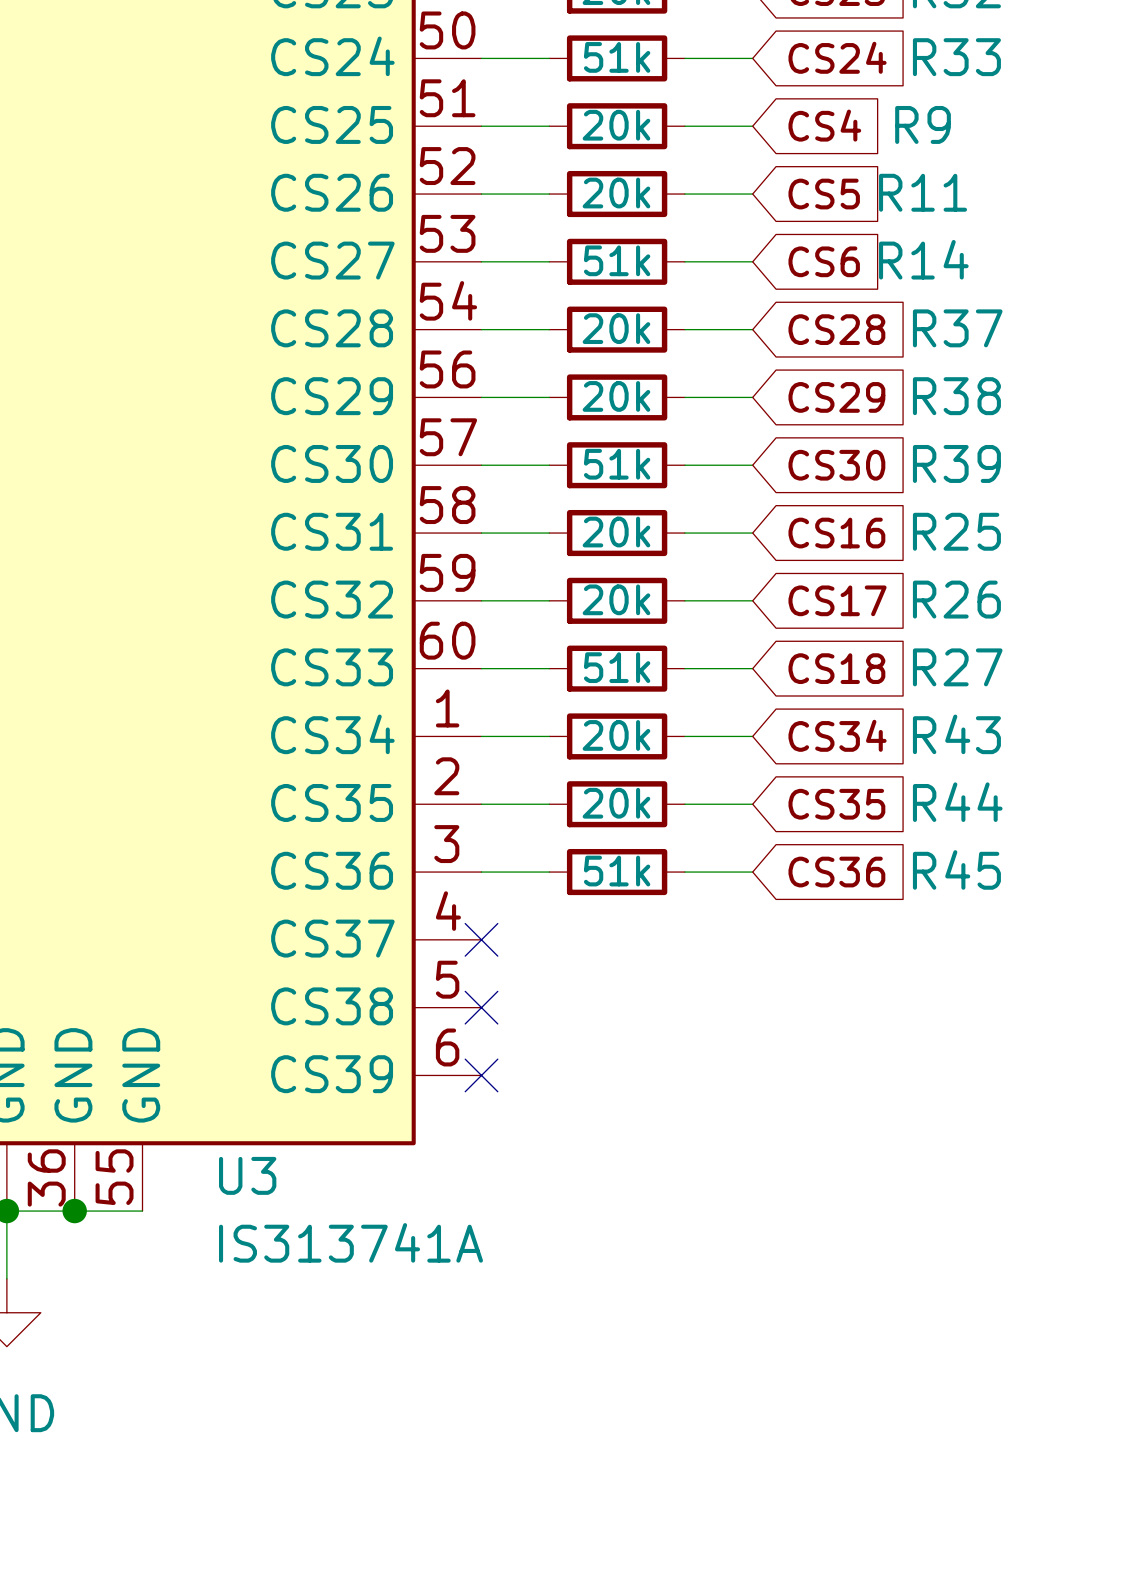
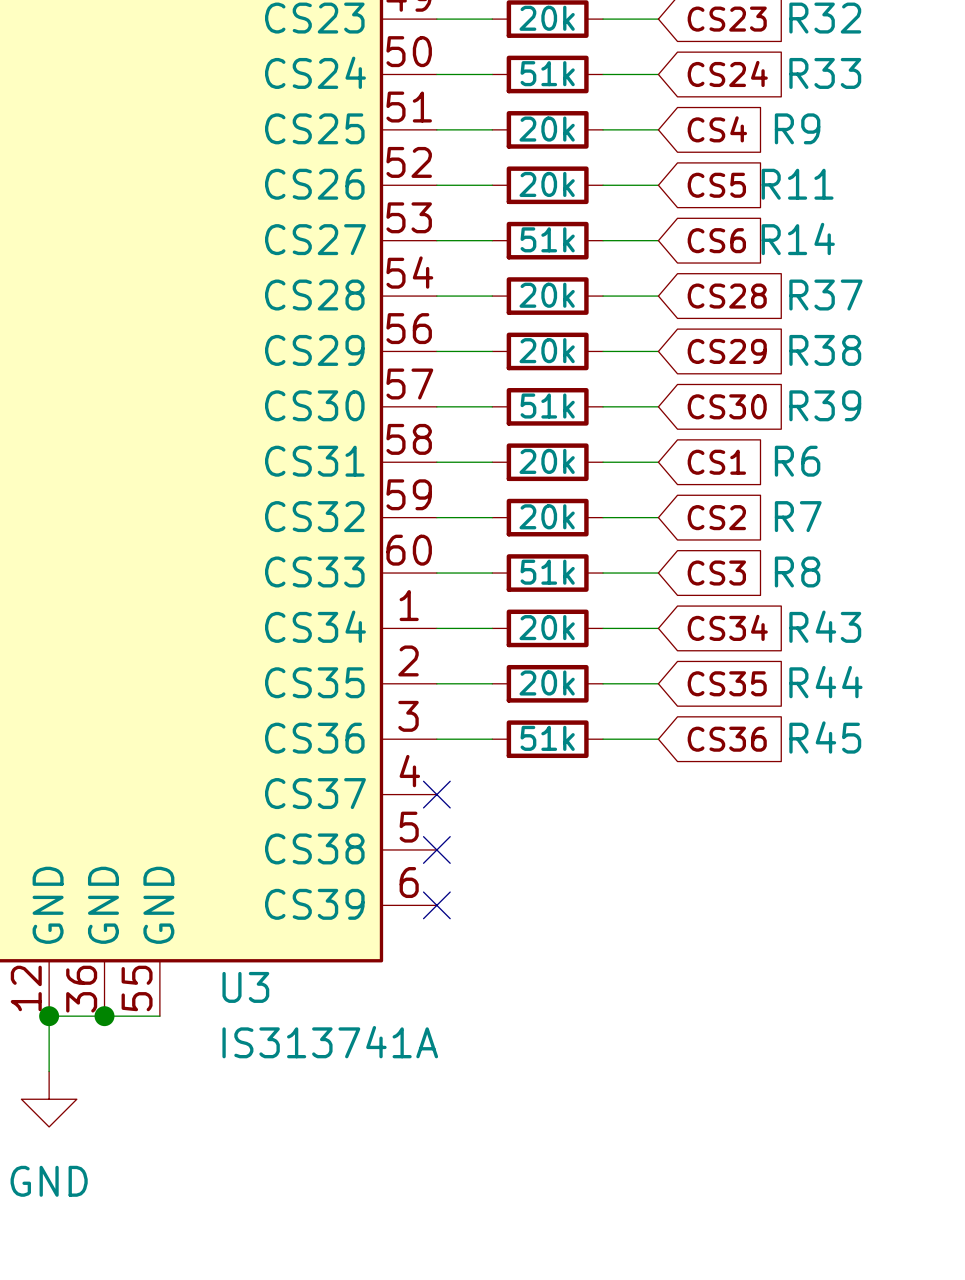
R25 name: R25 (956, 531) -> R6 (797, 461)
global label: CS16 (836, 533) -> CS1 (716, 462)
R26 name: R26 (956, 599) -> R7 (798, 516)
global label: CS17 (837, 600) -> CS2 (716, 517)
R27 name: R27 (957, 667) -> R8 (797, 571)
global label: CS18 (836, 668) -> CS3 (716, 573)

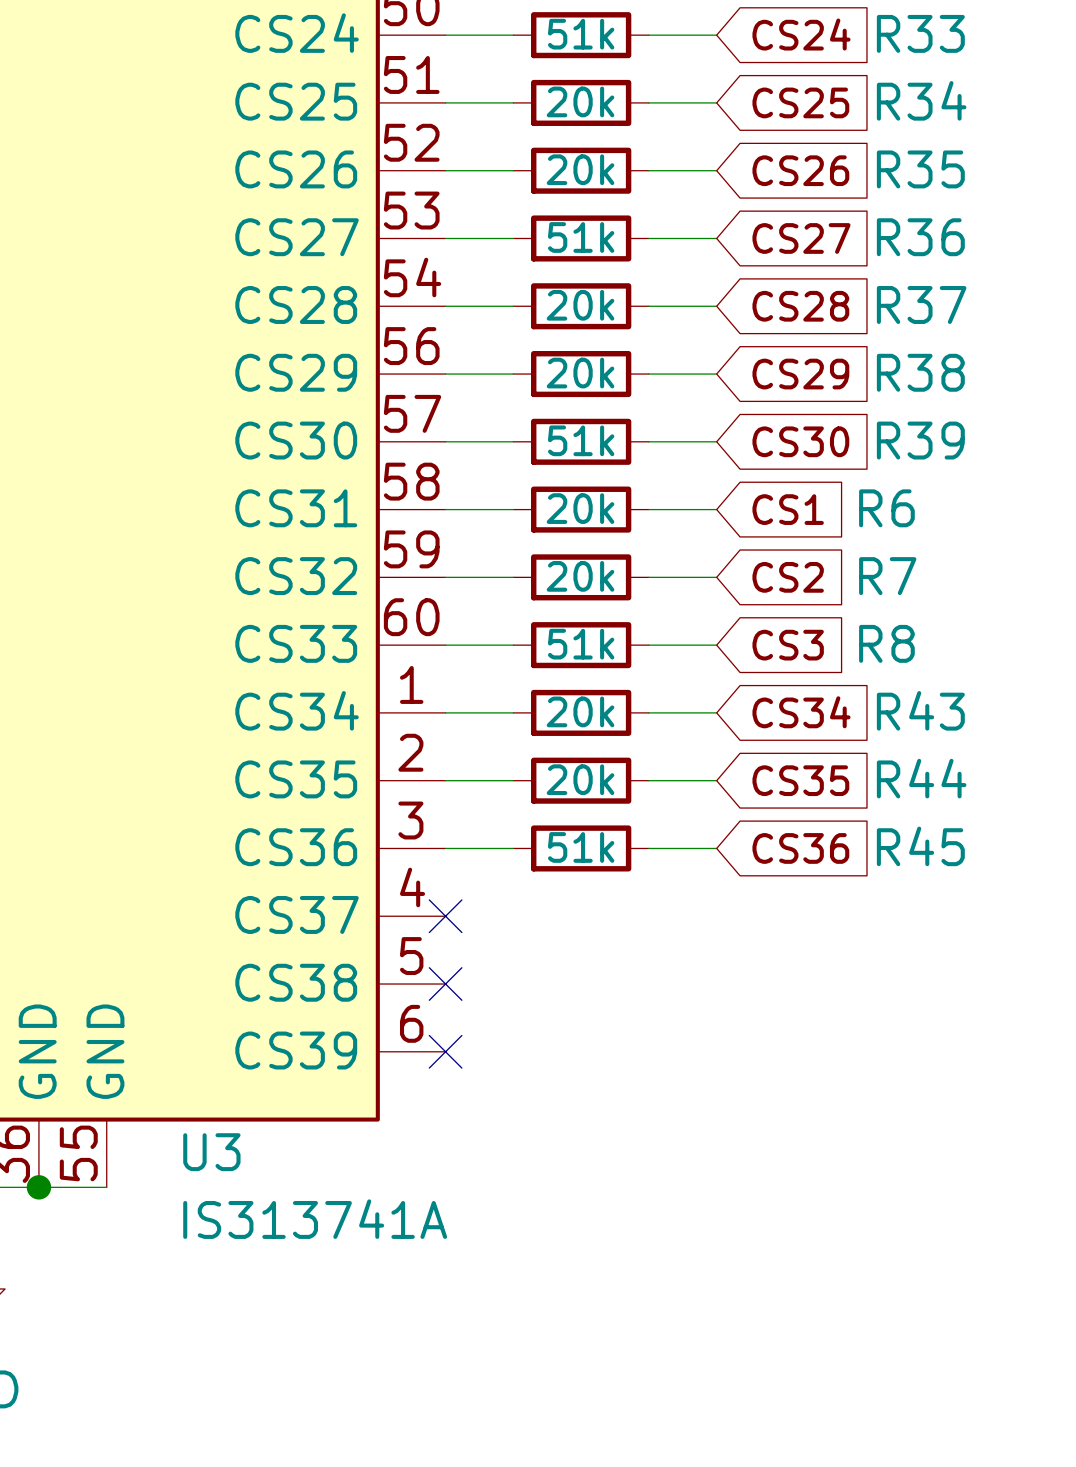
R9 name: R9 (797, 128) -> R34 (921, 100)
global label: CS4 (717, 129) -> CS25 (800, 102)
R11 name: R11 (797, 184) -> R35 (920, 169)
global label: CS5 (716, 185) -> CS26 (800, 170)
R14 name: R14 (798, 238) -> R36 (920, 237)
global label: CS6 (716, 240) -> CS27 (801, 238)

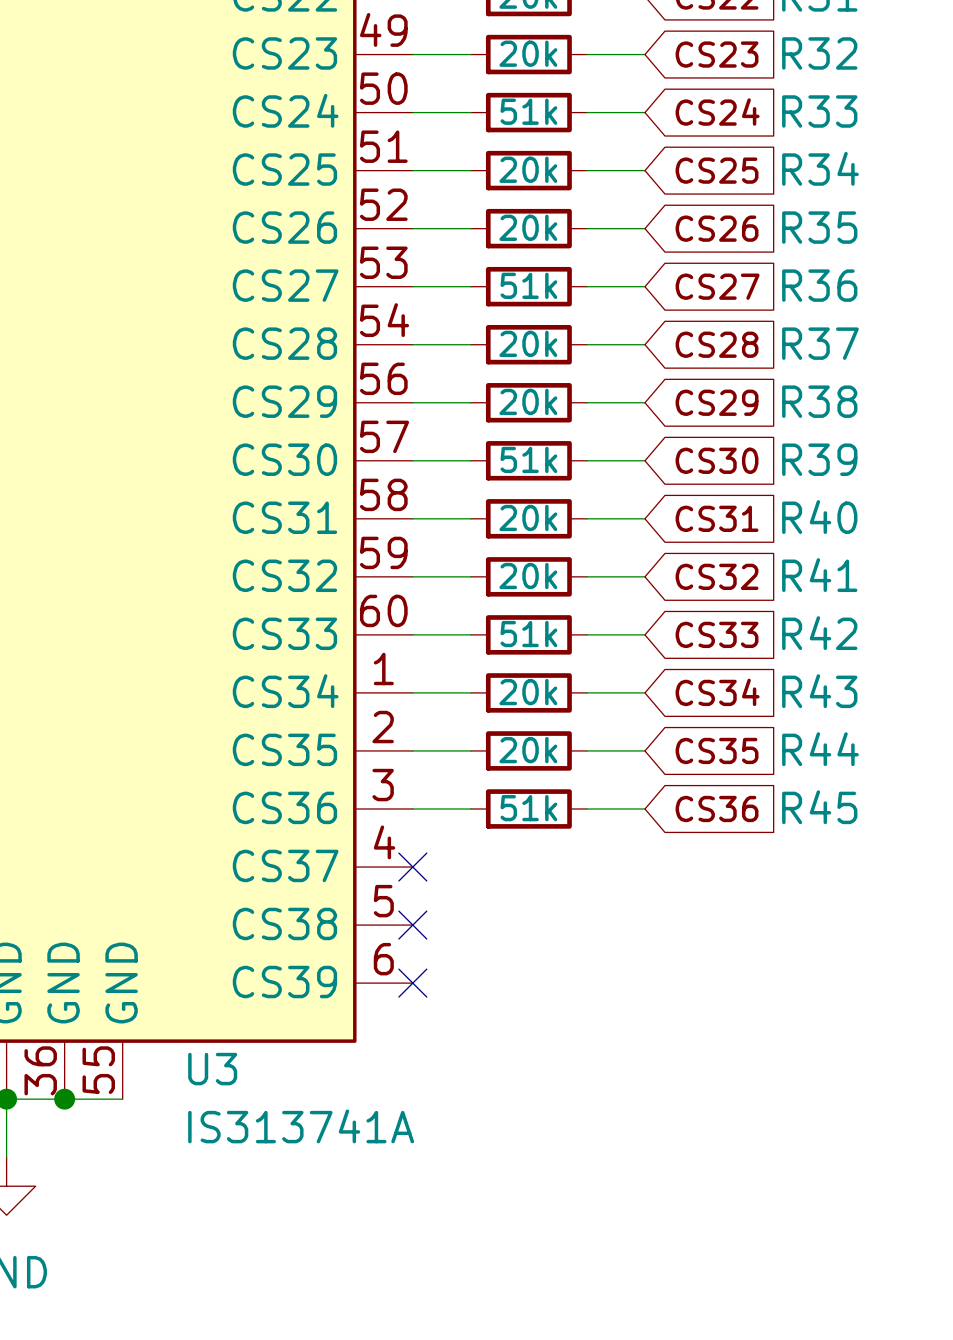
R6 name: R6 (886, 508) -> R40 (819, 517)
global label: CS1 (788, 509) -> CS31 (717, 518)
R7 name: R7 (887, 576) -> R41 (819, 575)
global label: CS2 (788, 577) -> CS32 (717, 576)
R8 name: R8 (886, 643) -> R42 (819, 633)
global label: CS3 (788, 645) -> CS33 (717, 634)

